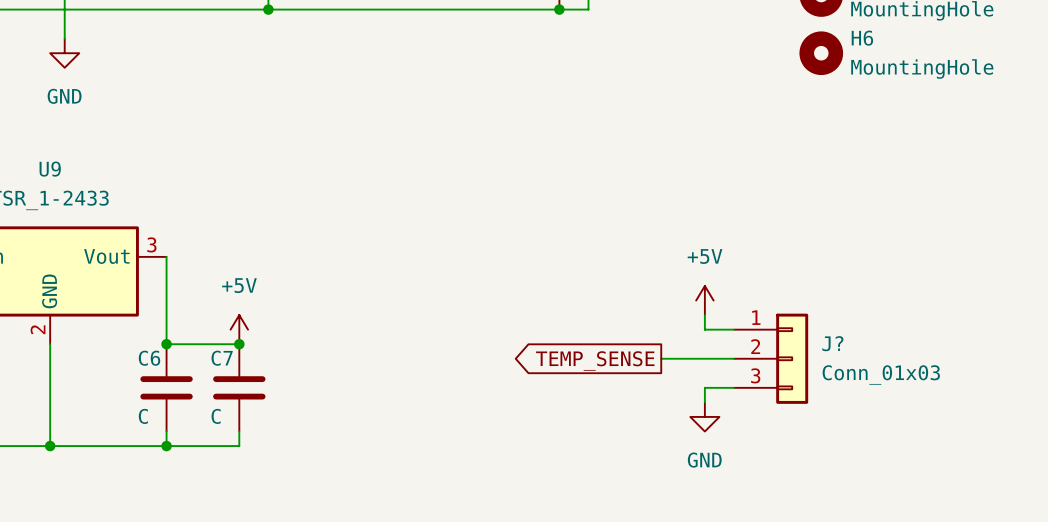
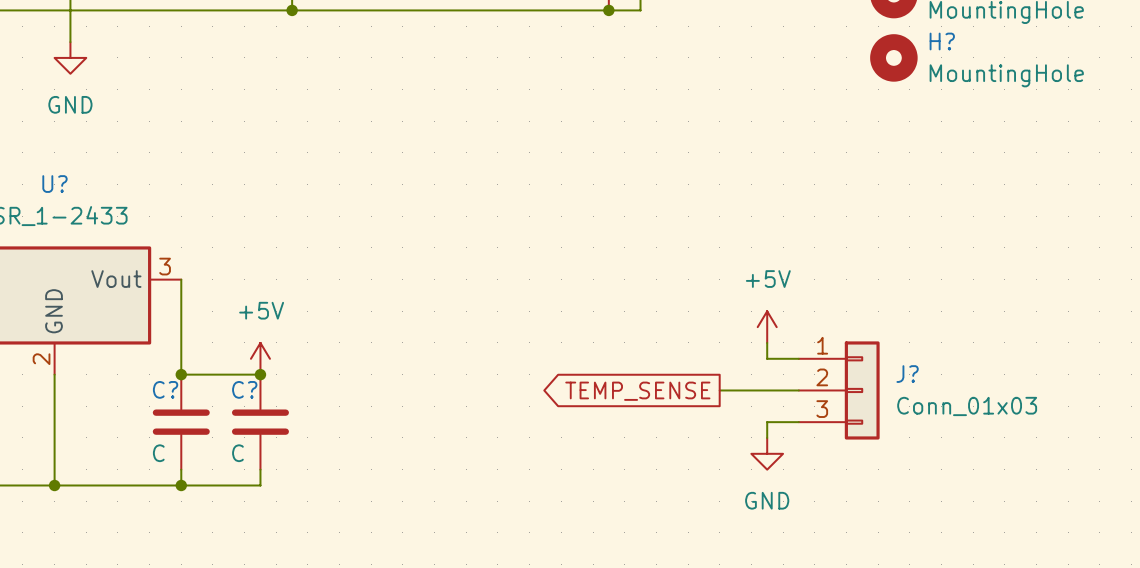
H6 name: H6 (862, 38) -> H? (942, 41)
U9 name: U9 (50, 169) -> U? (54, 184)
C6 name: C6 (149, 358) -> C? (165, 389)
C7 name: C7 (222, 358) -> C? (244, 389)

